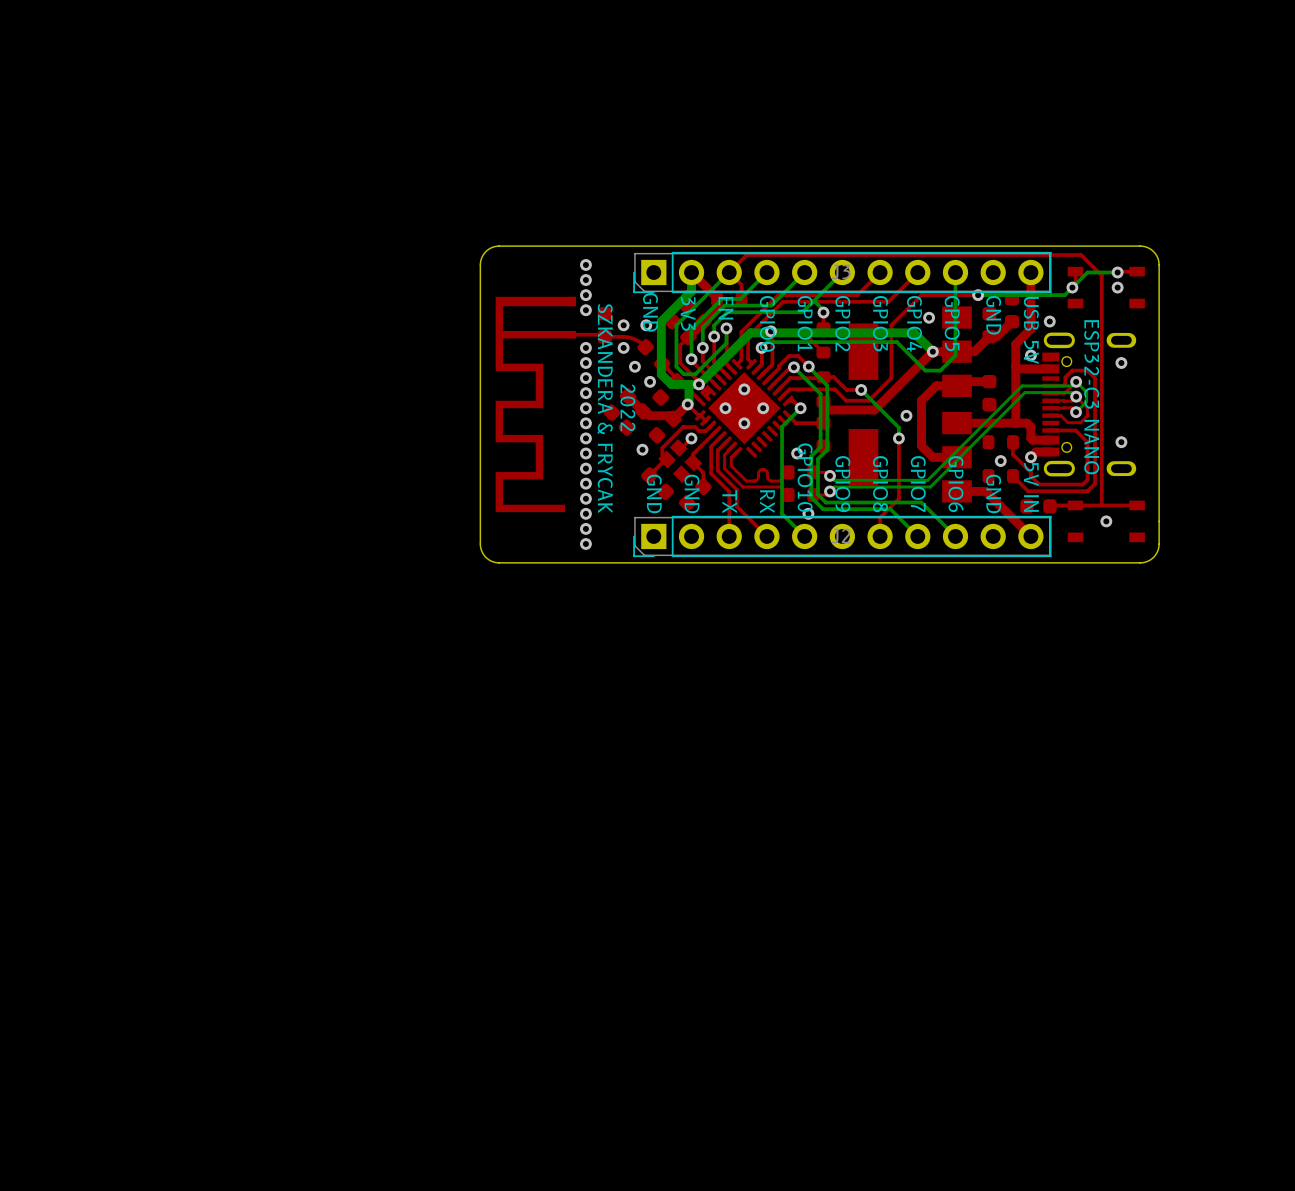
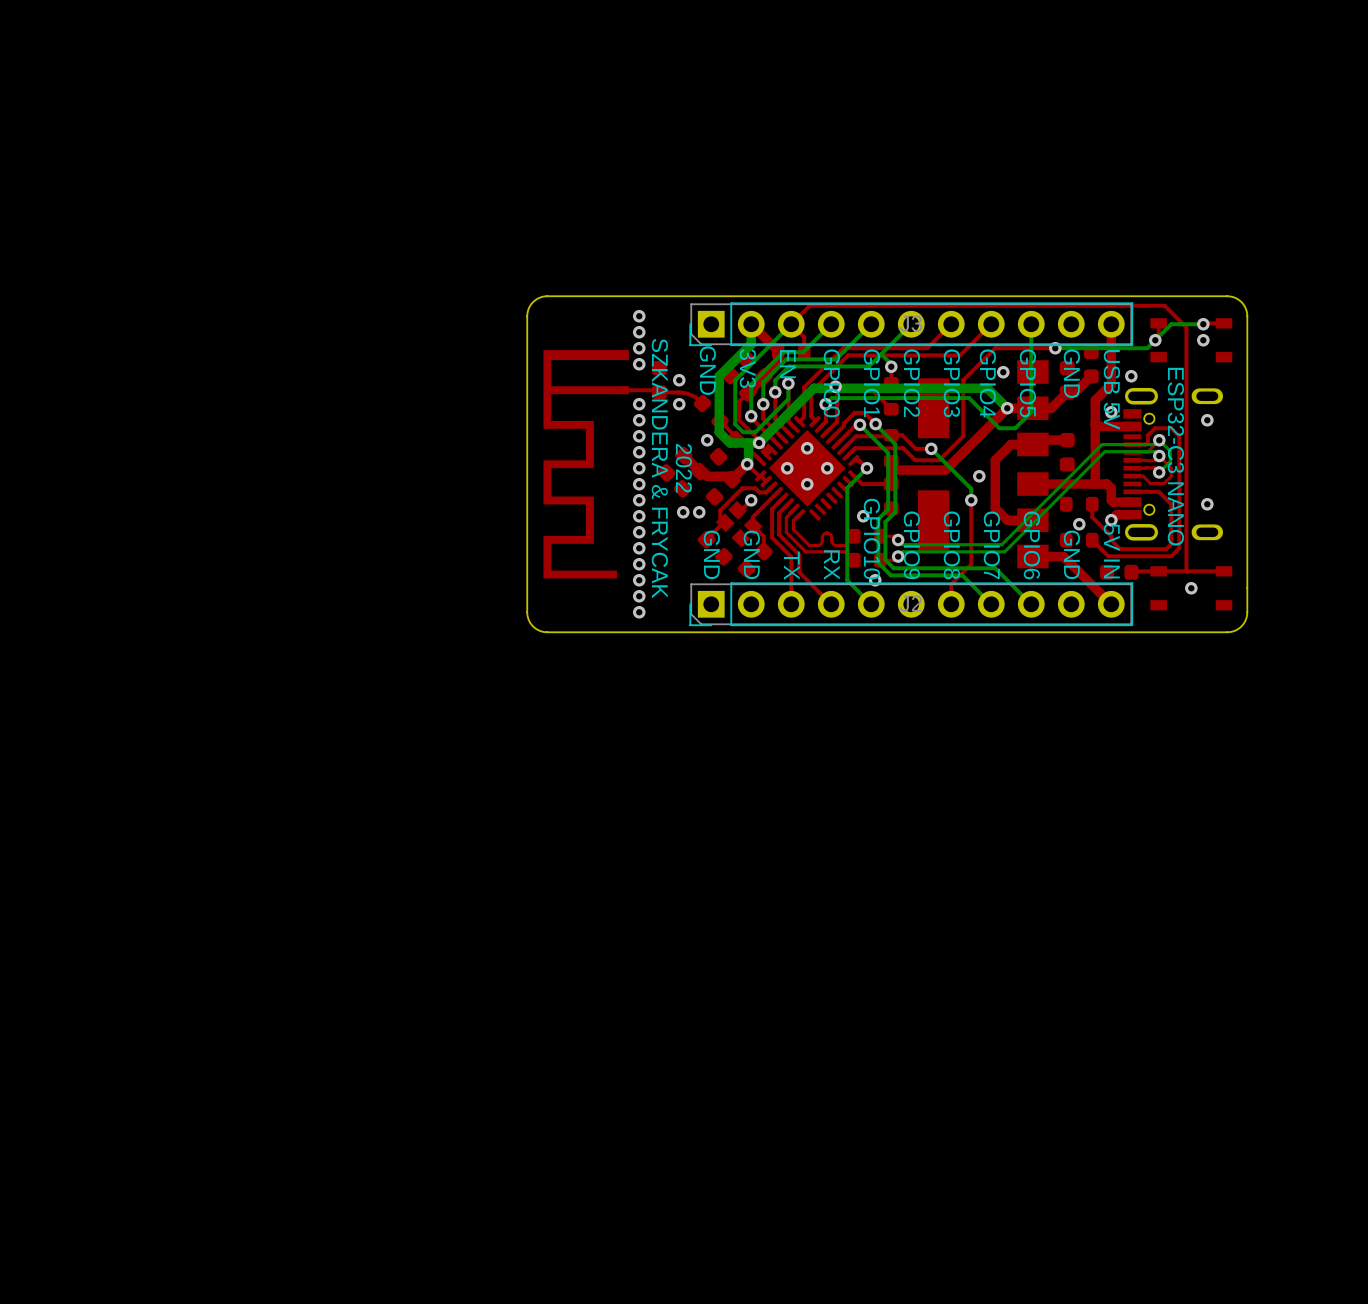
via: (646, 325) -> none
via: (634, 366) -> none
via: none -> (683, 512)

